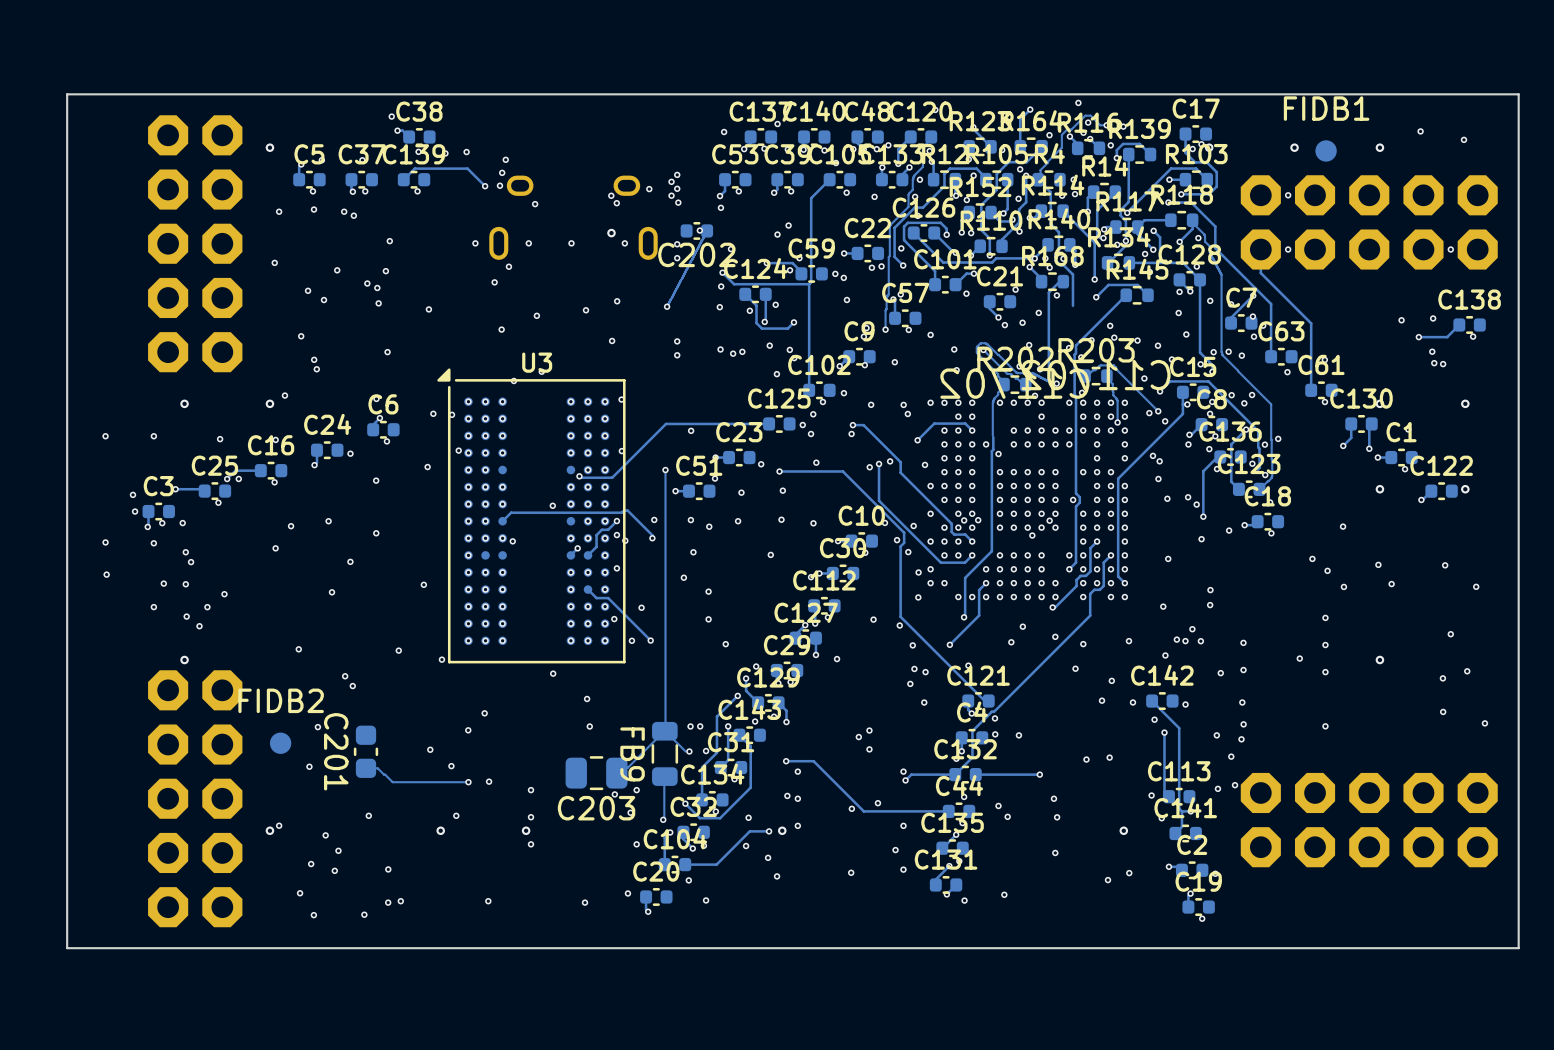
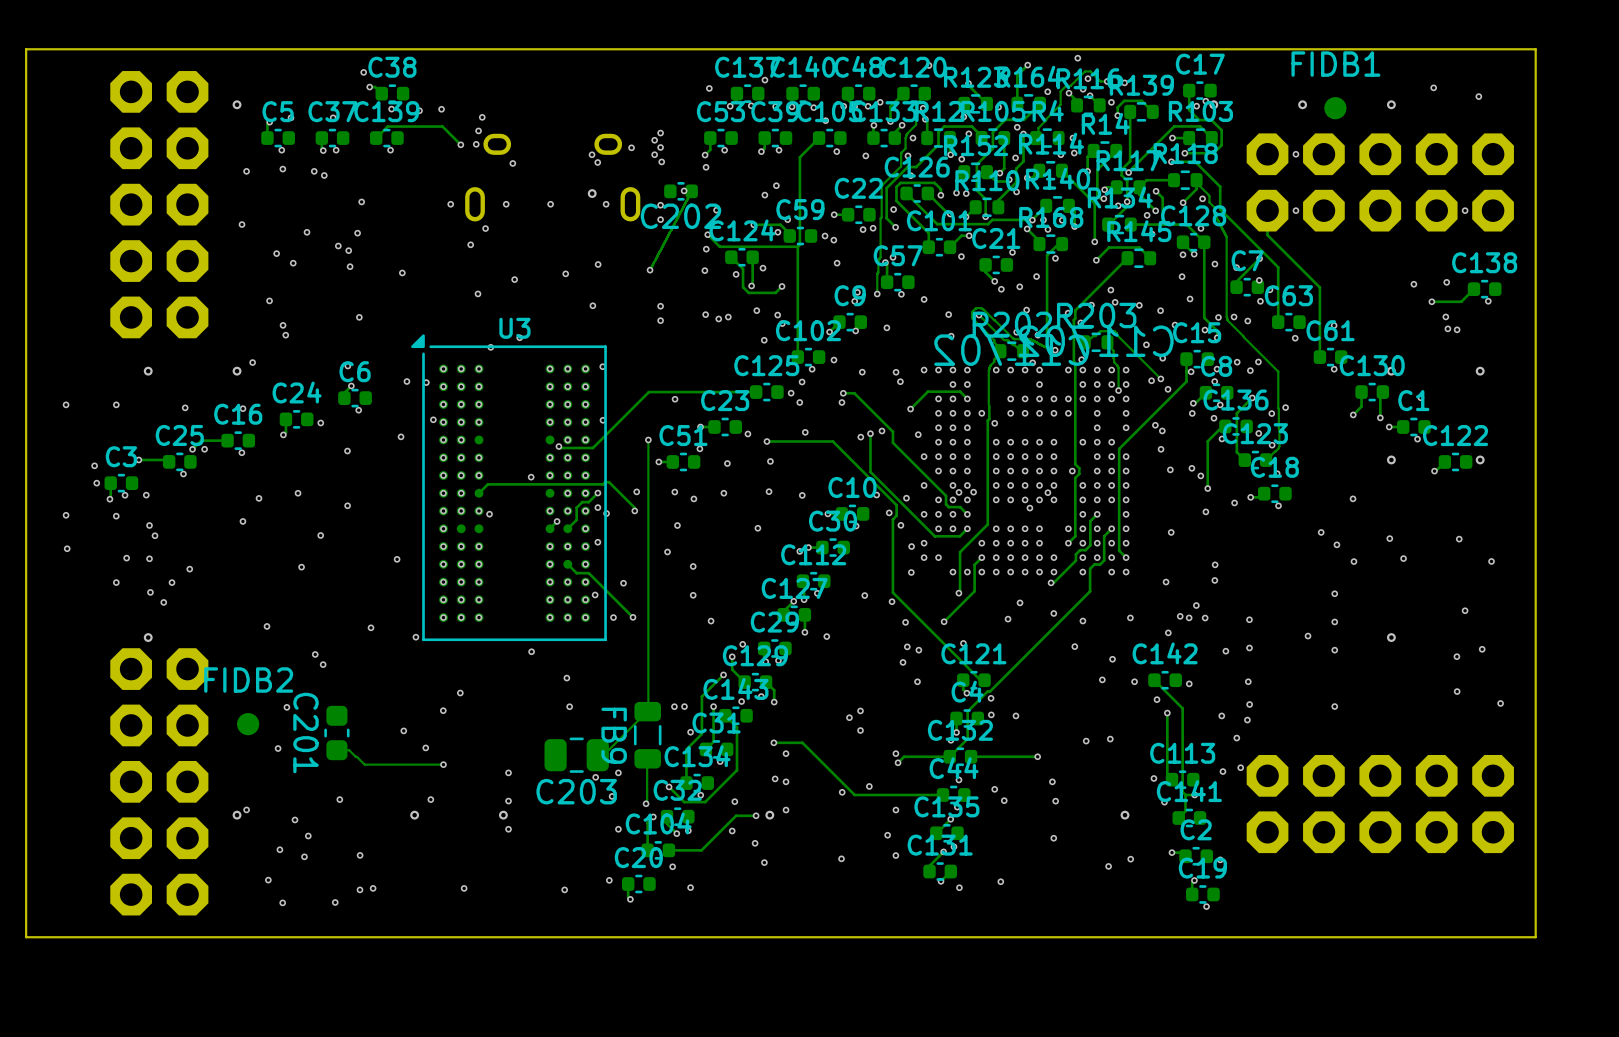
track: (1038, 179) (1050, 192) (1050, 224) (1058, 232) (1058, 250) (1055, 254) (1055, 260) (1072, 274) (1072, 305) -> none
track: (1160, 391) (1170, 381) (1208, 381) (1258, 431) (1259, 467) (1257, 469) -> none
track: (665, 731) (685, 751) -> none
via: (689, 751) -> none
via: (489, 781) -> none

